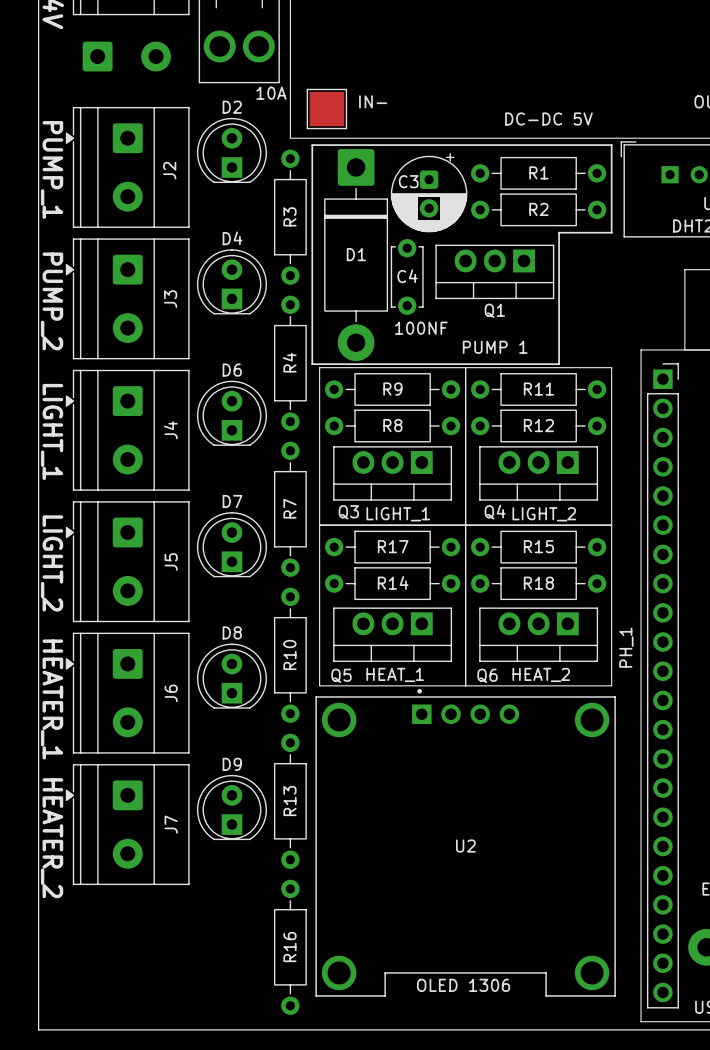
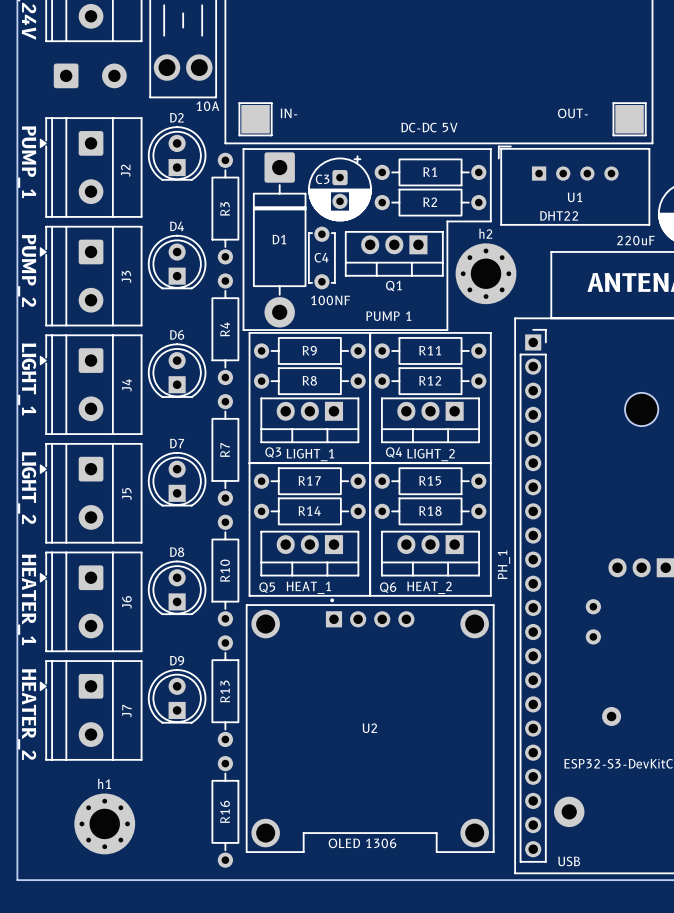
h2: none -> (486, 273)
h1: none -> (104, 823)

